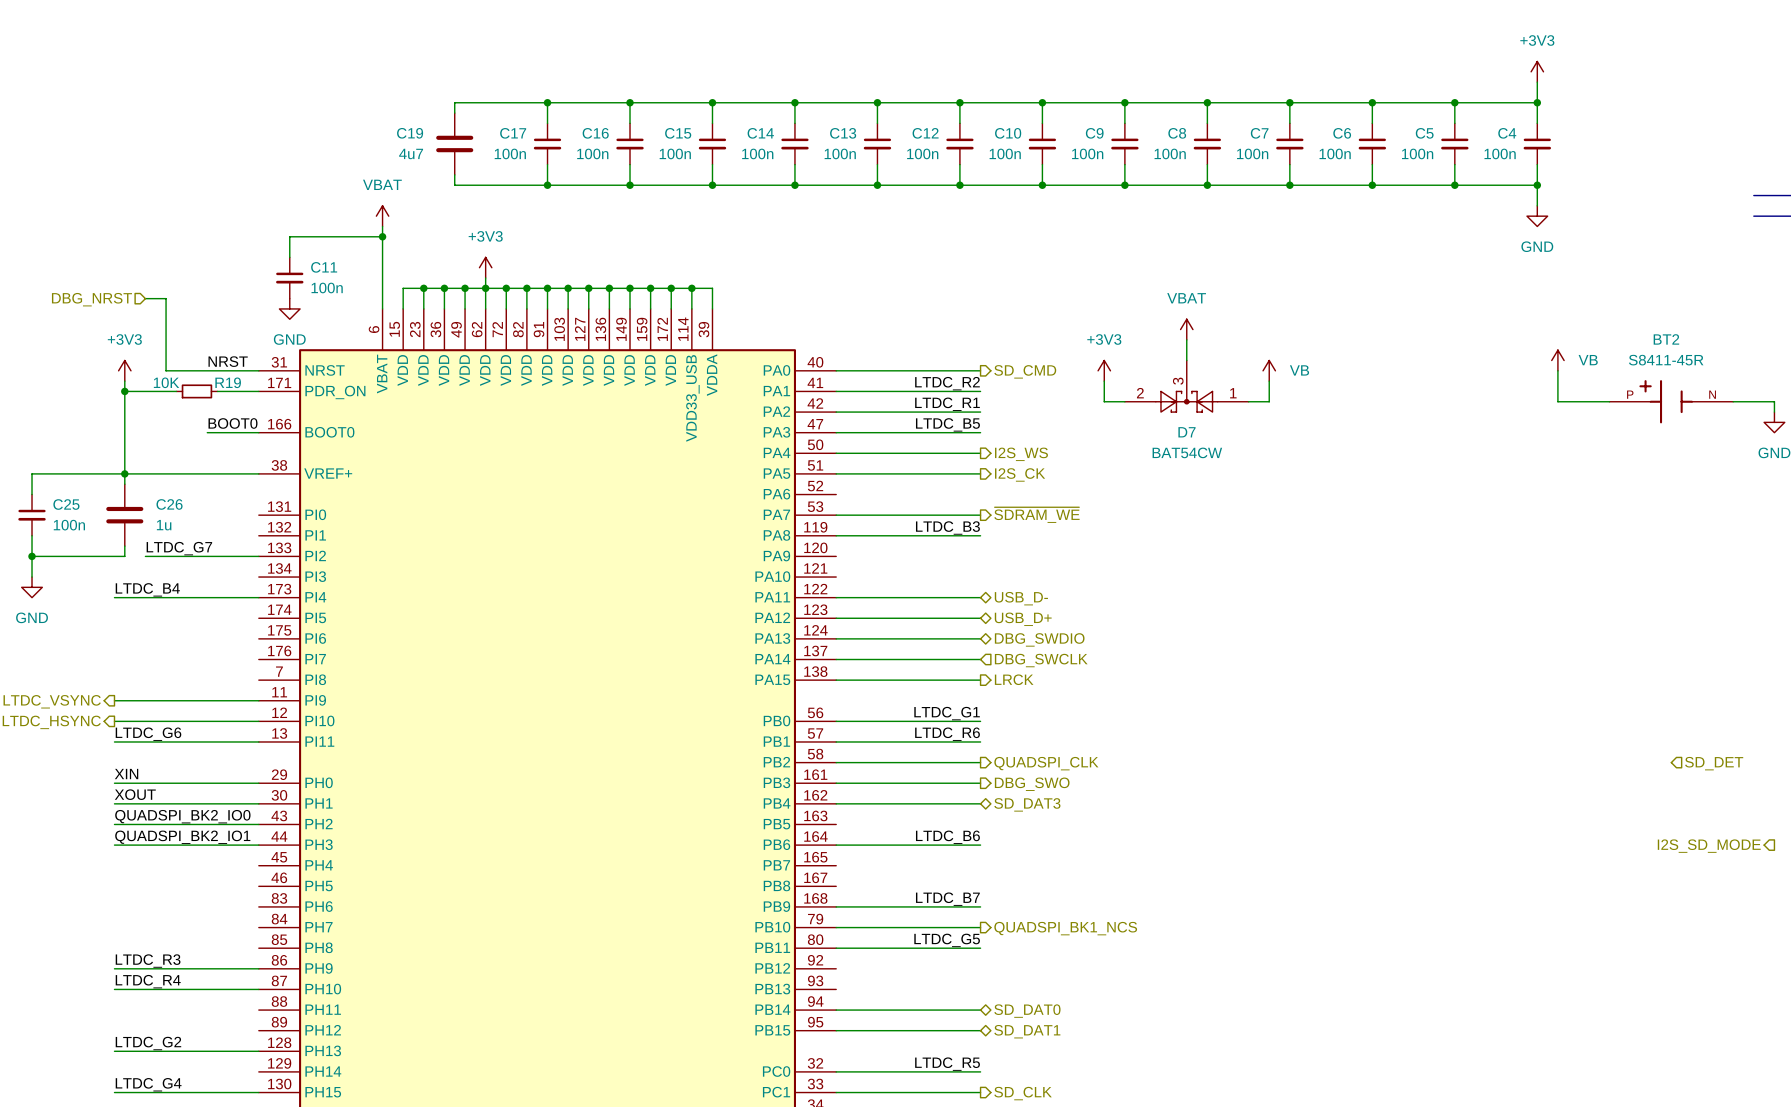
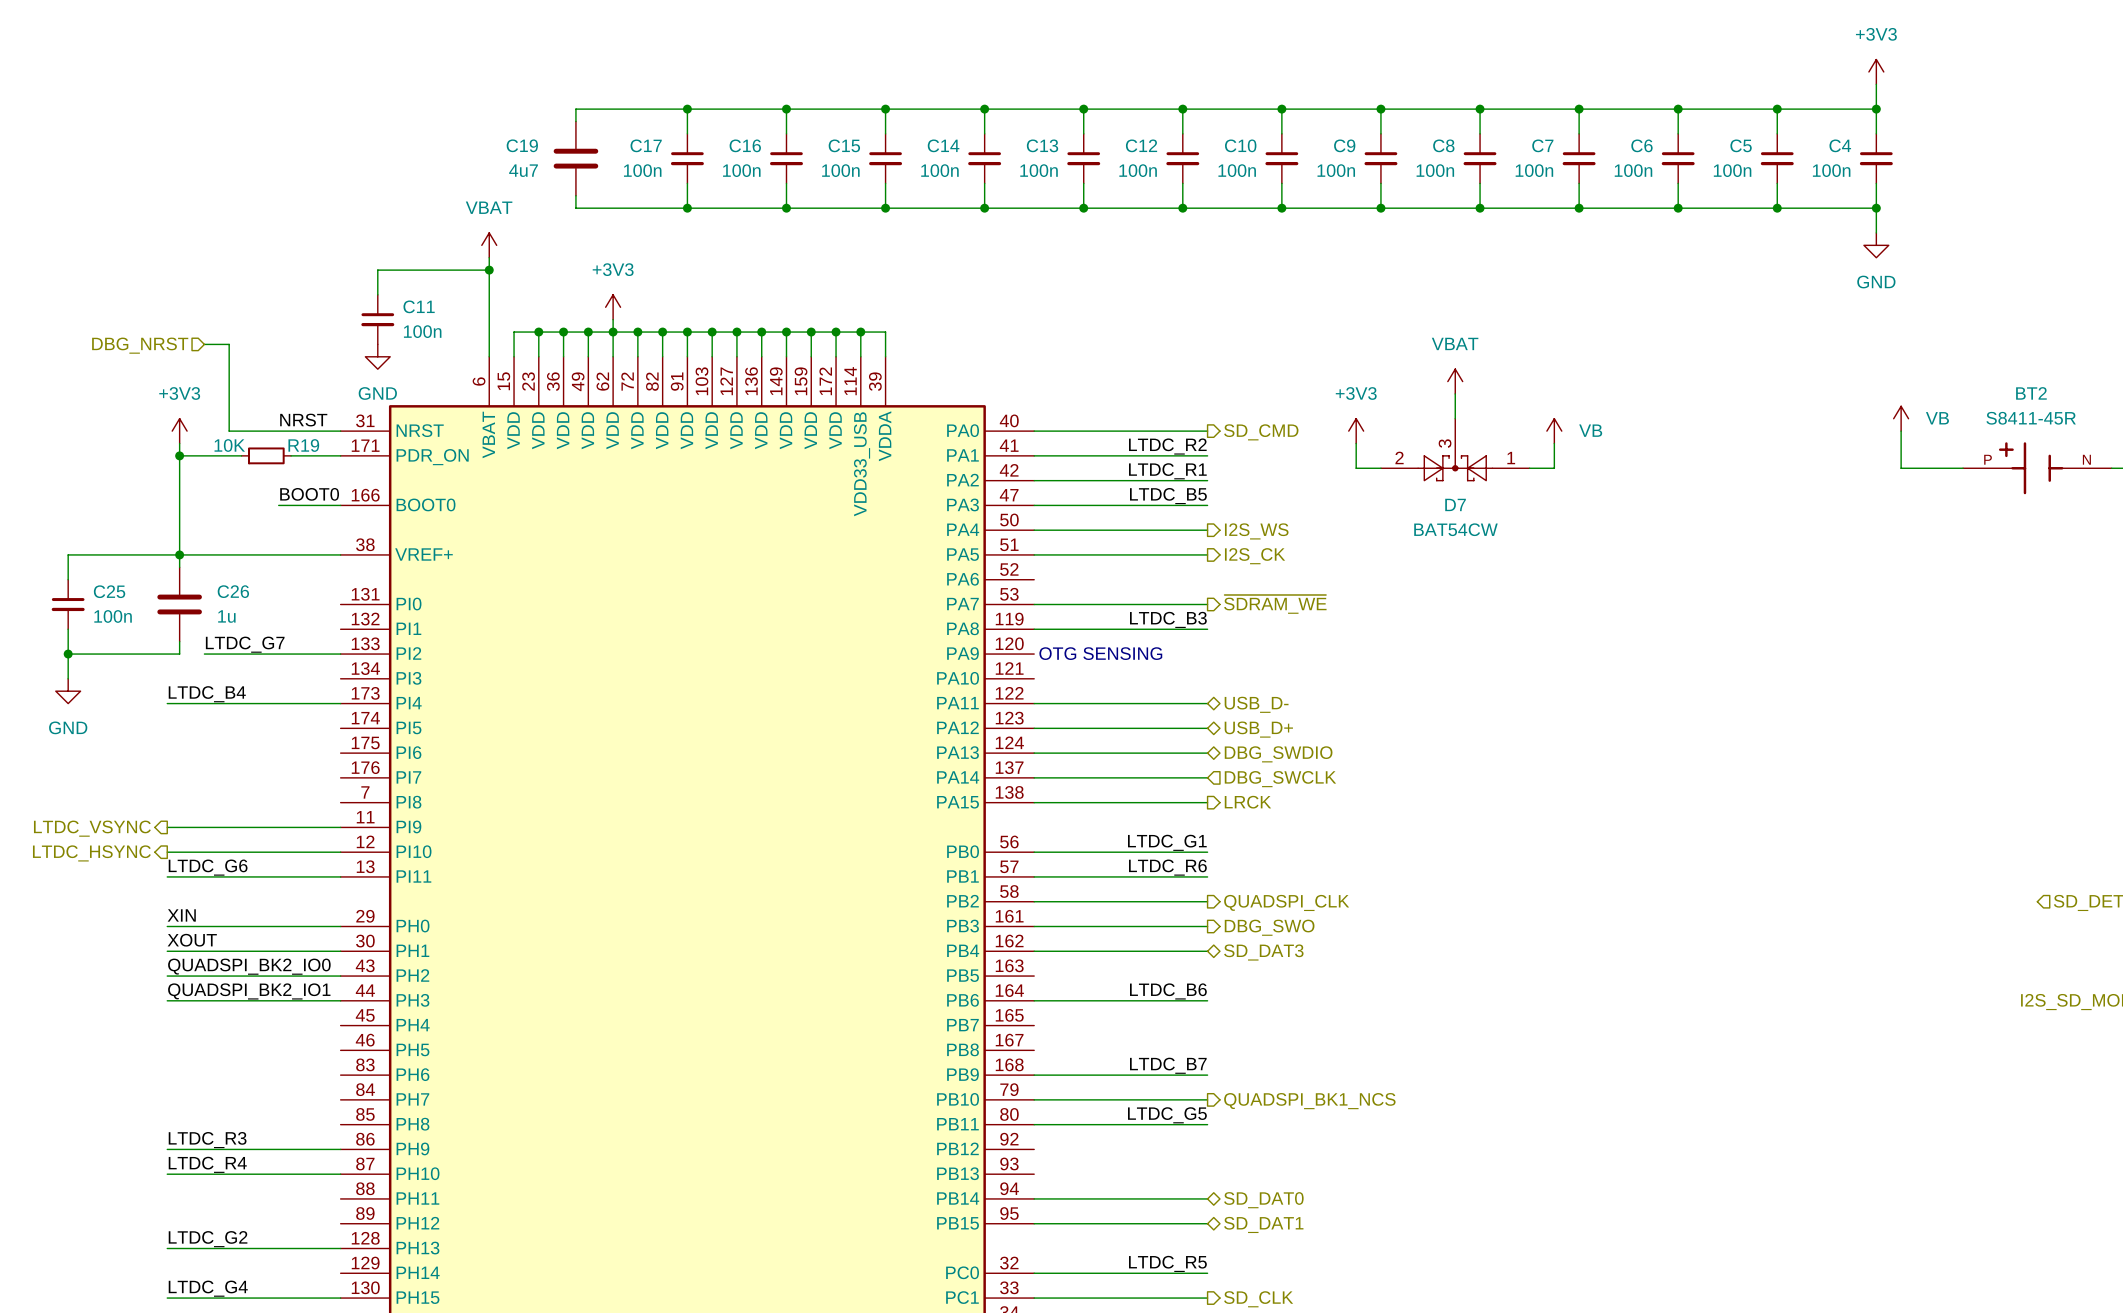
text: none -> OTG SENSING (1100, 653)

